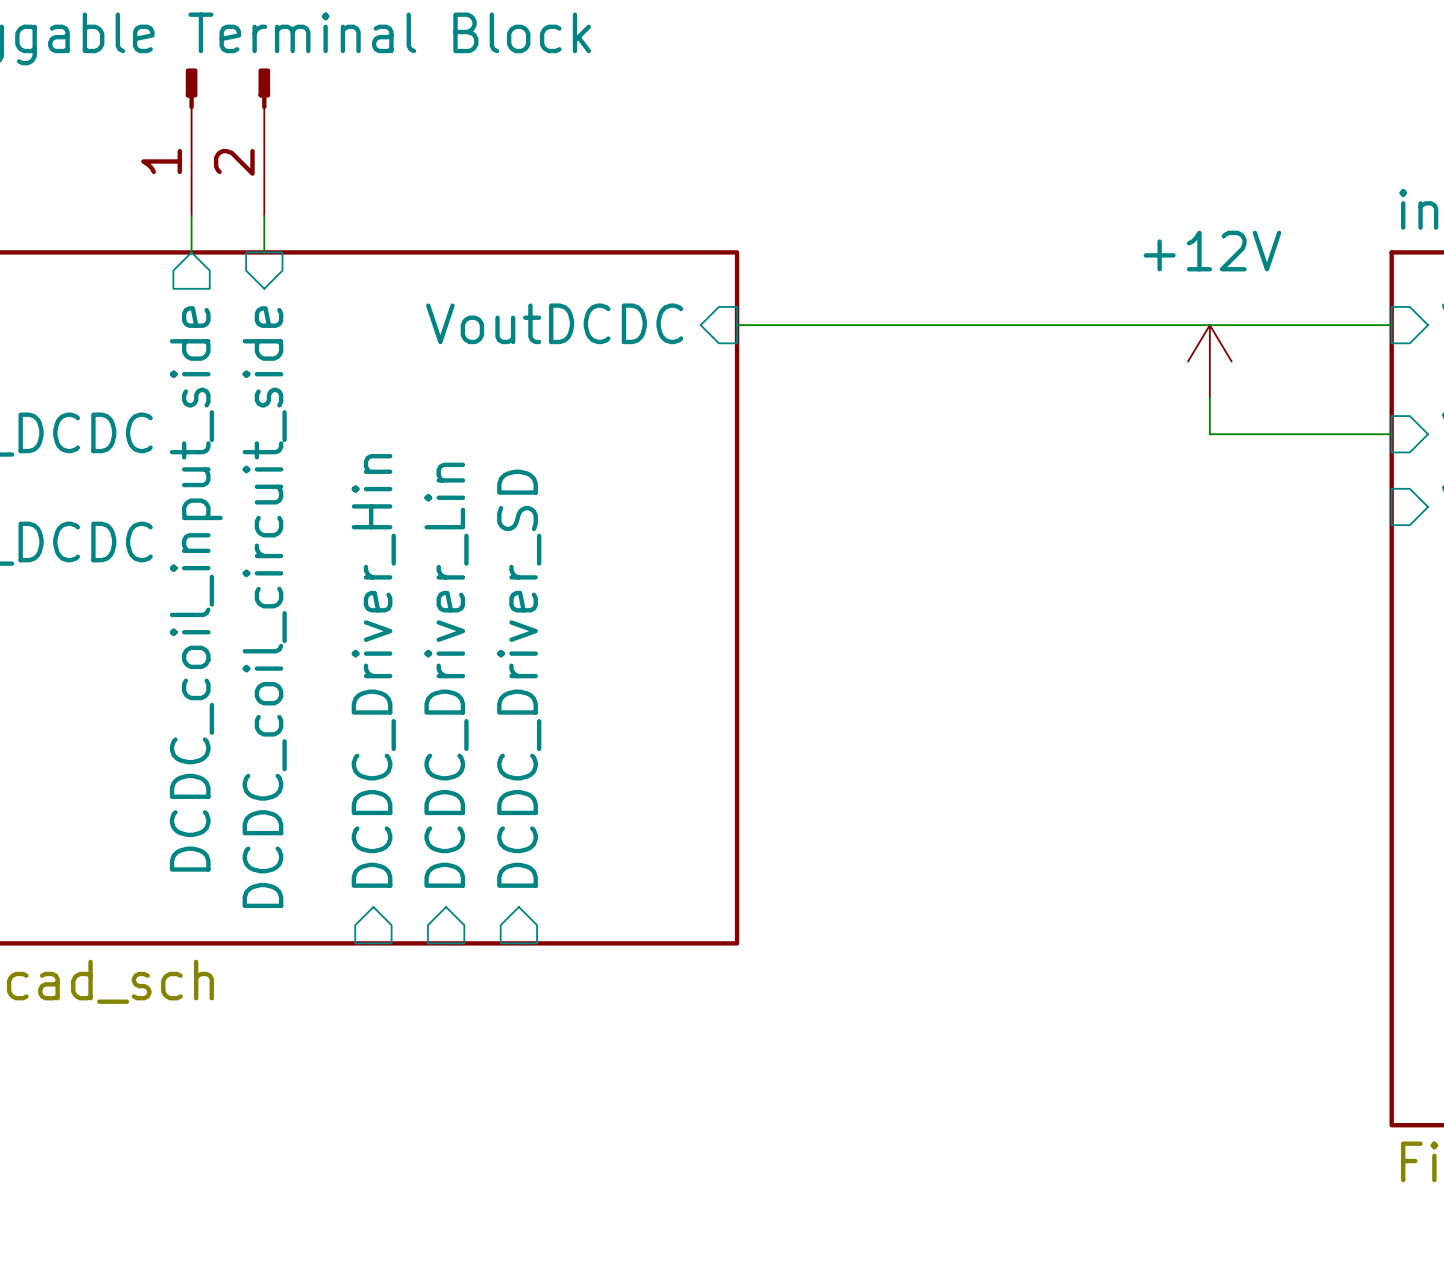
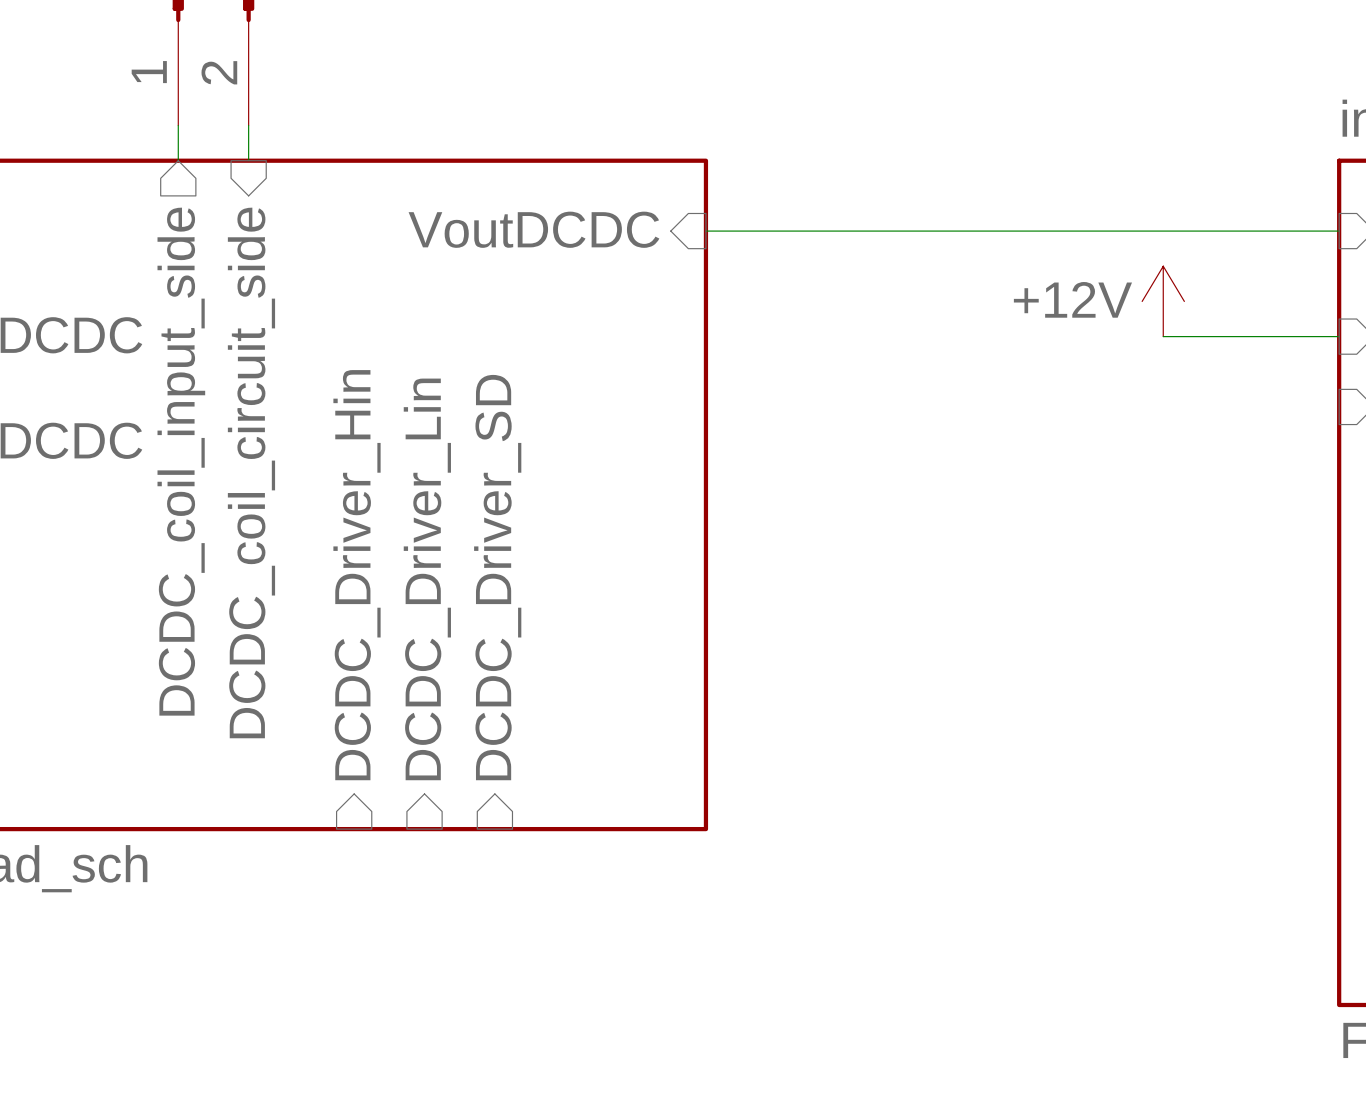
power symbol text position: +12V (1212, 251) -> +12V (1072, 299)
power symbol position: +12V (1209, 361) -> +12V (1163, 301)

